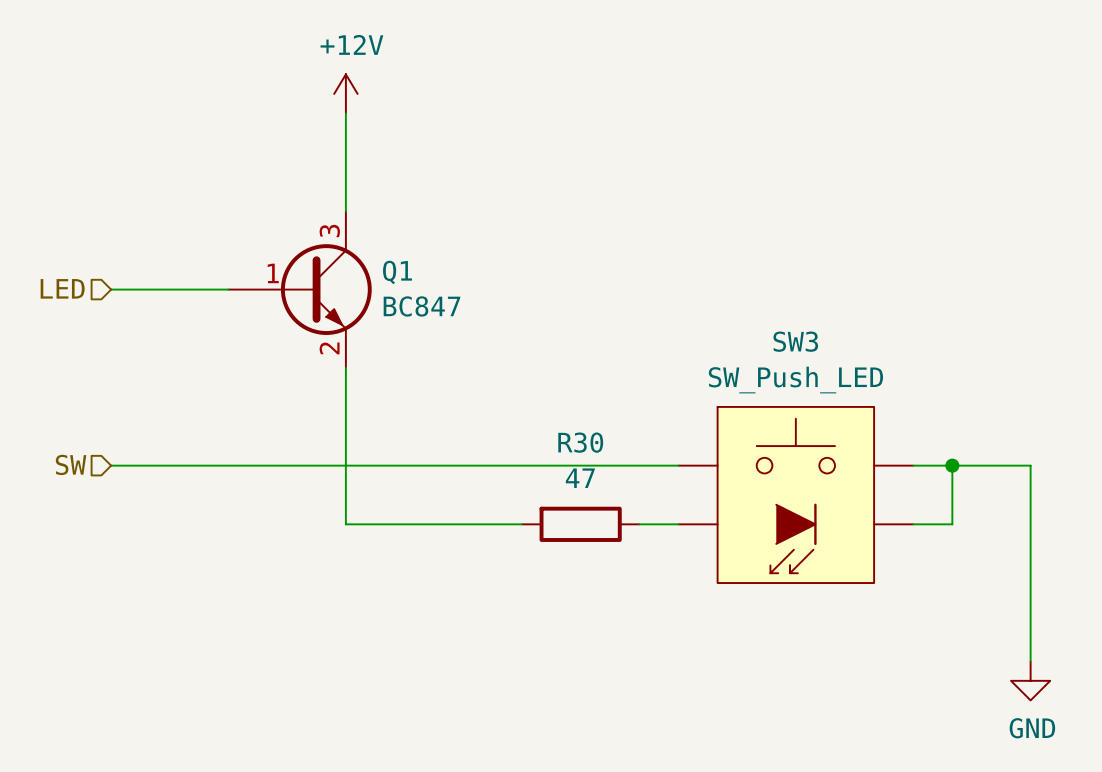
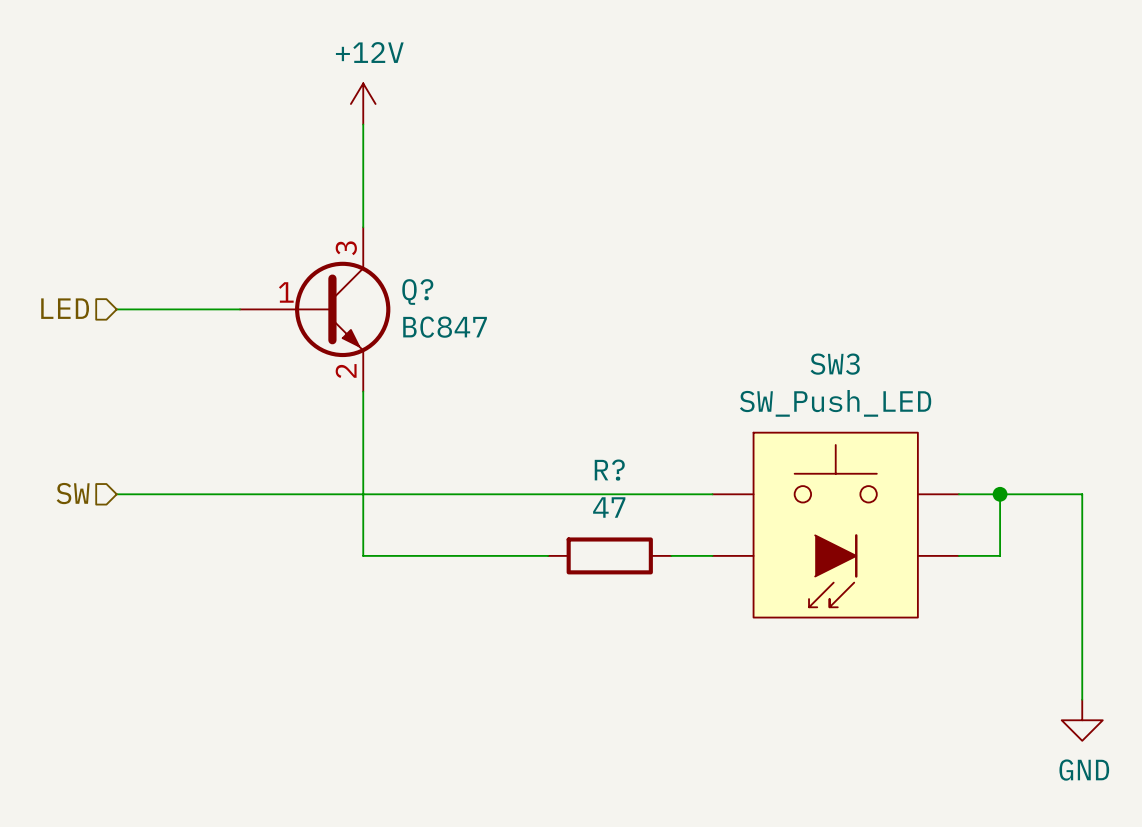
Q1 name: Q1 (397, 272) -> Q? (417, 291)
R30 name: R30 (580, 442) -> R? (609, 470)

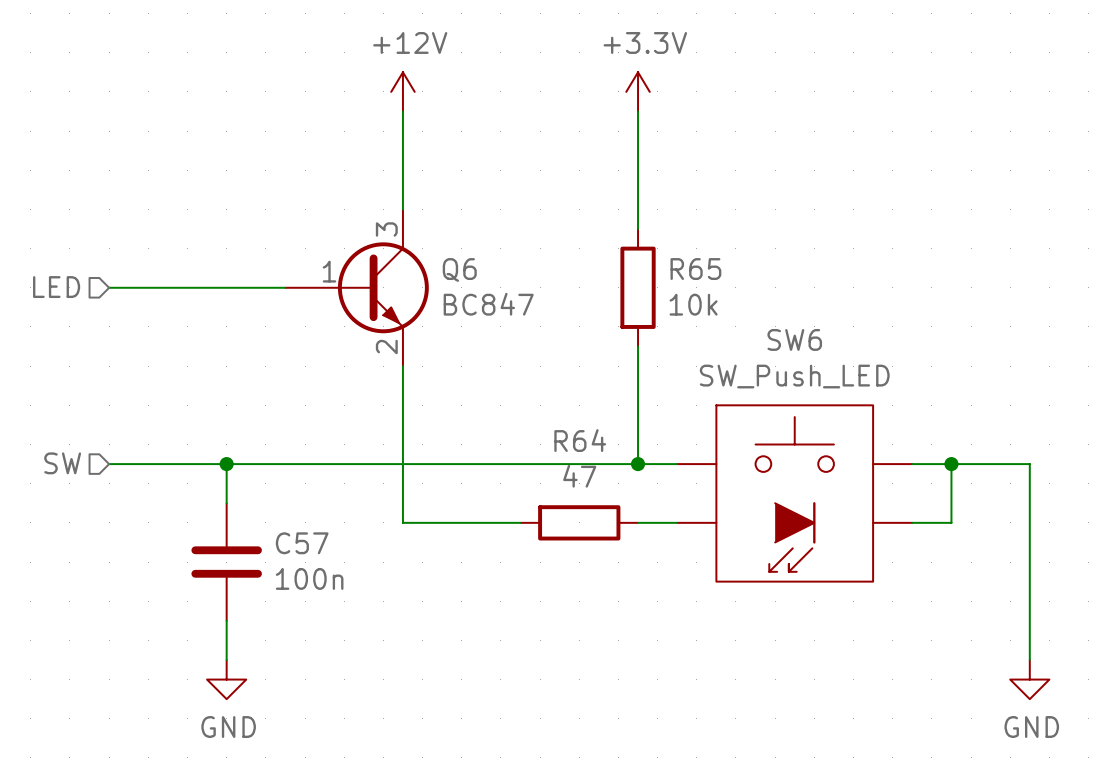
power symbol position: +12V (363, 103) -> +12V (402, 91)
power symbol: none -> +3.3V (638, 91)
wire: (363, 124) (363, 227) -> (402, 111) (402, 209)
wire: none -> (638, 111) (638, 229)
Q?: BC847 (315, 309) -> none
Q6: none -> BC847 (357, 287)
R65: none -> 10k (638, 287)
SW3 name: SW3 (835, 364) -> SW6 (794, 339)
wire: none -> (638, 346) (638, 464)
wire: (363, 391) (363, 555) (424, 555) -> (402, 366) (402, 522)
R? name: R? (609, 470) -> R64 (580, 440)
wire: none -> (226, 464) (226, 503)
junction: none -> (226, 464)
junction: none -> (638, 464)
C57: none -> 100n (226, 562)
wire: none -> (226, 620) (226, 659)
power symbol: none -> GND (226, 679)

